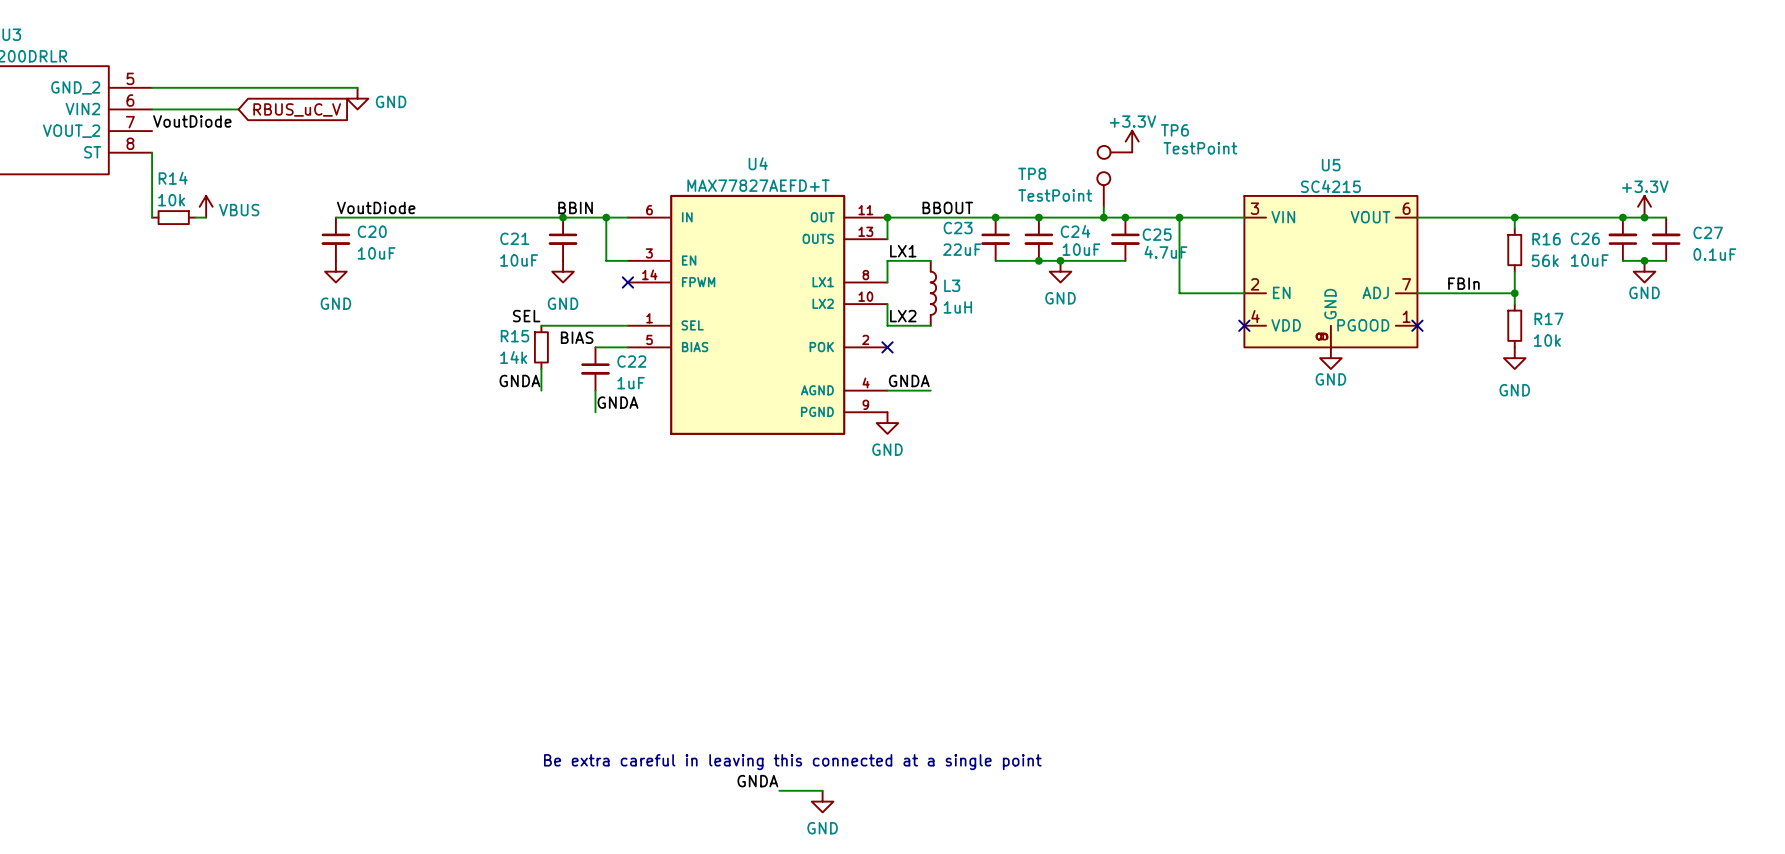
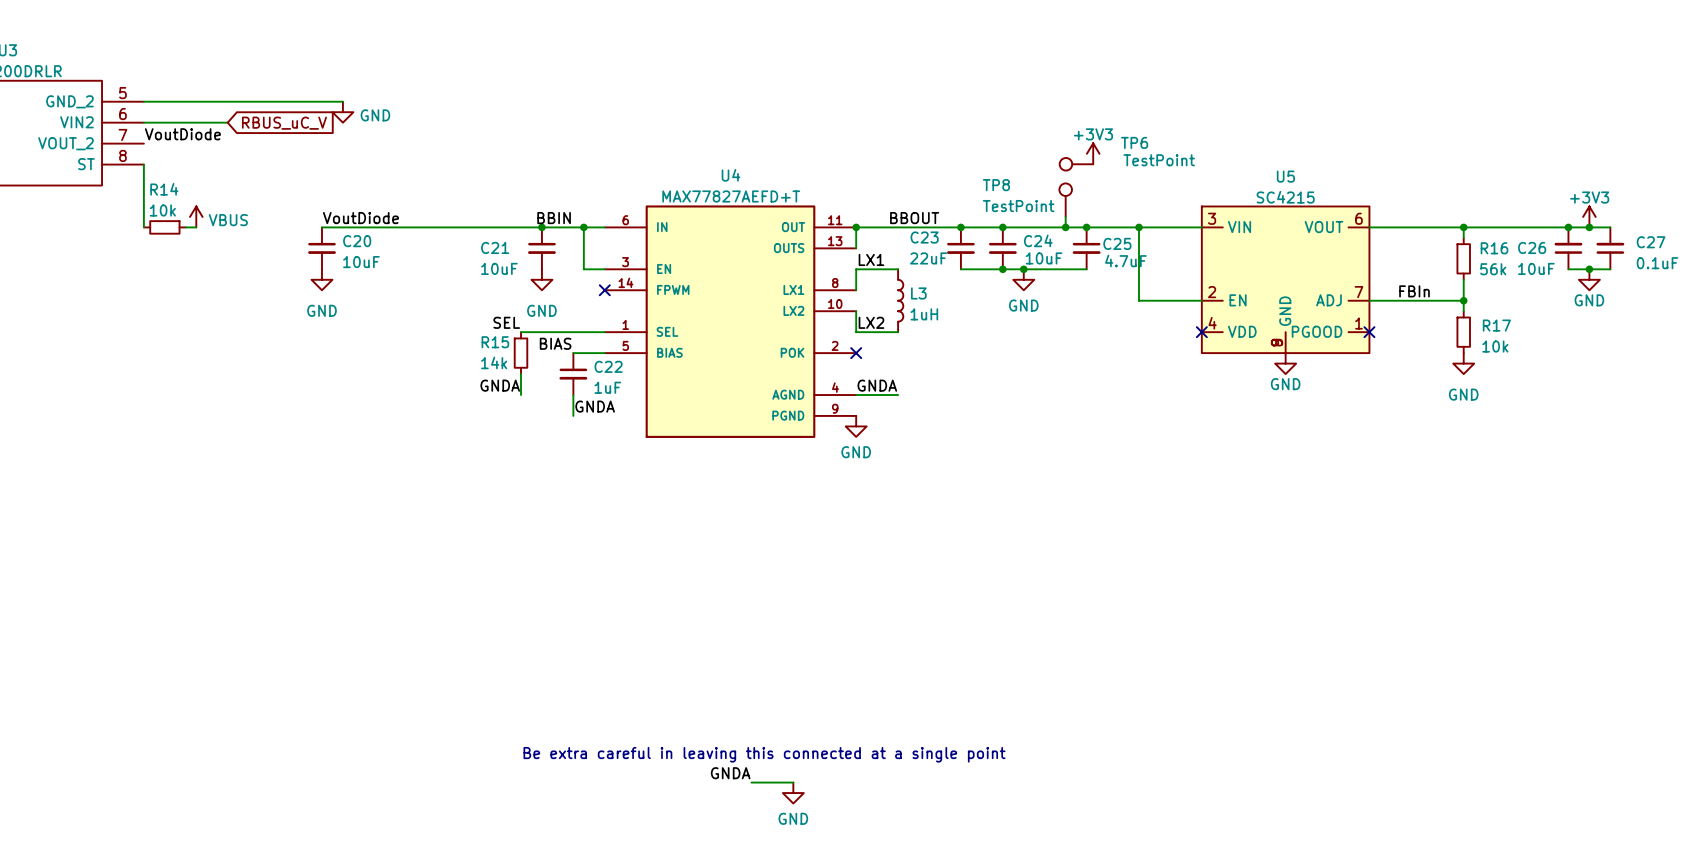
power symbol: +3.3V (1132, 141) -> +3V3 (1093, 153)
power symbol: +3.3V (1644, 206) -> +3V3 (1589, 216)

